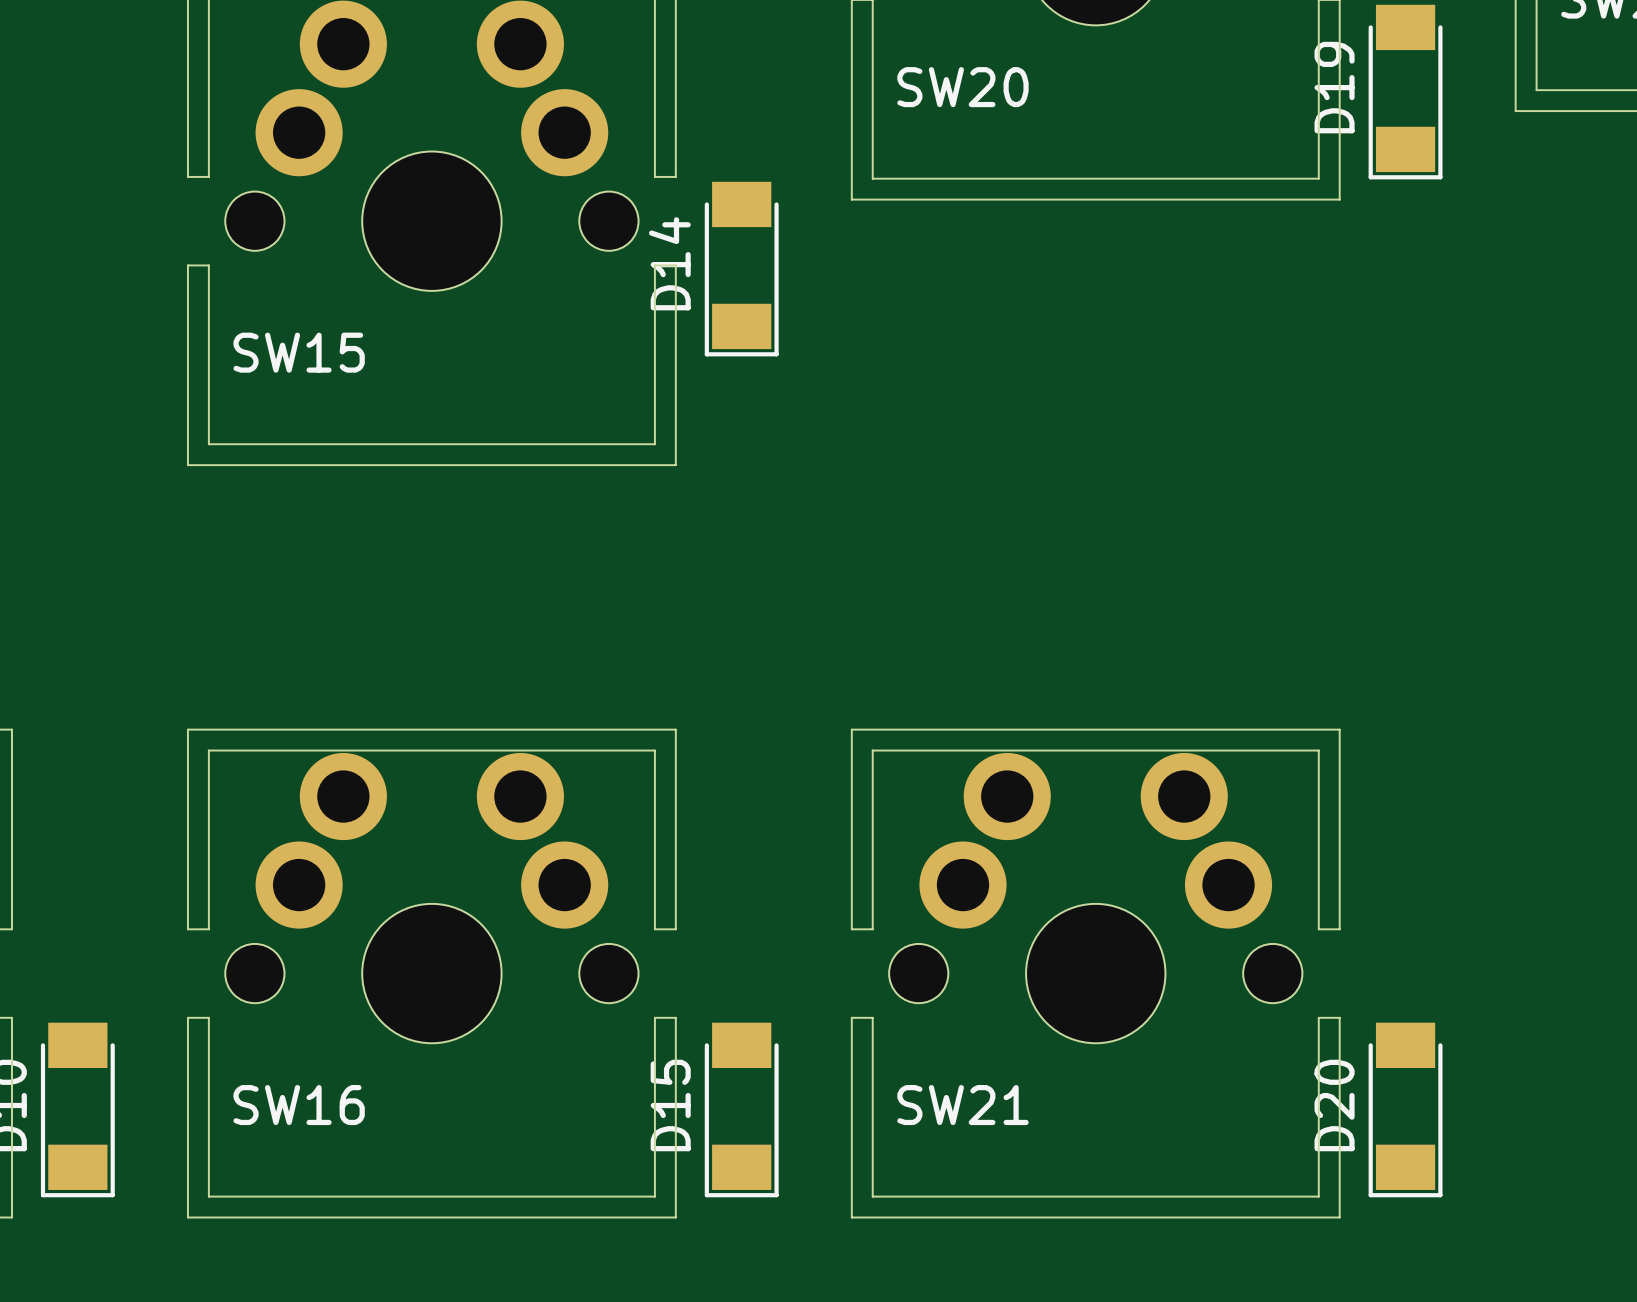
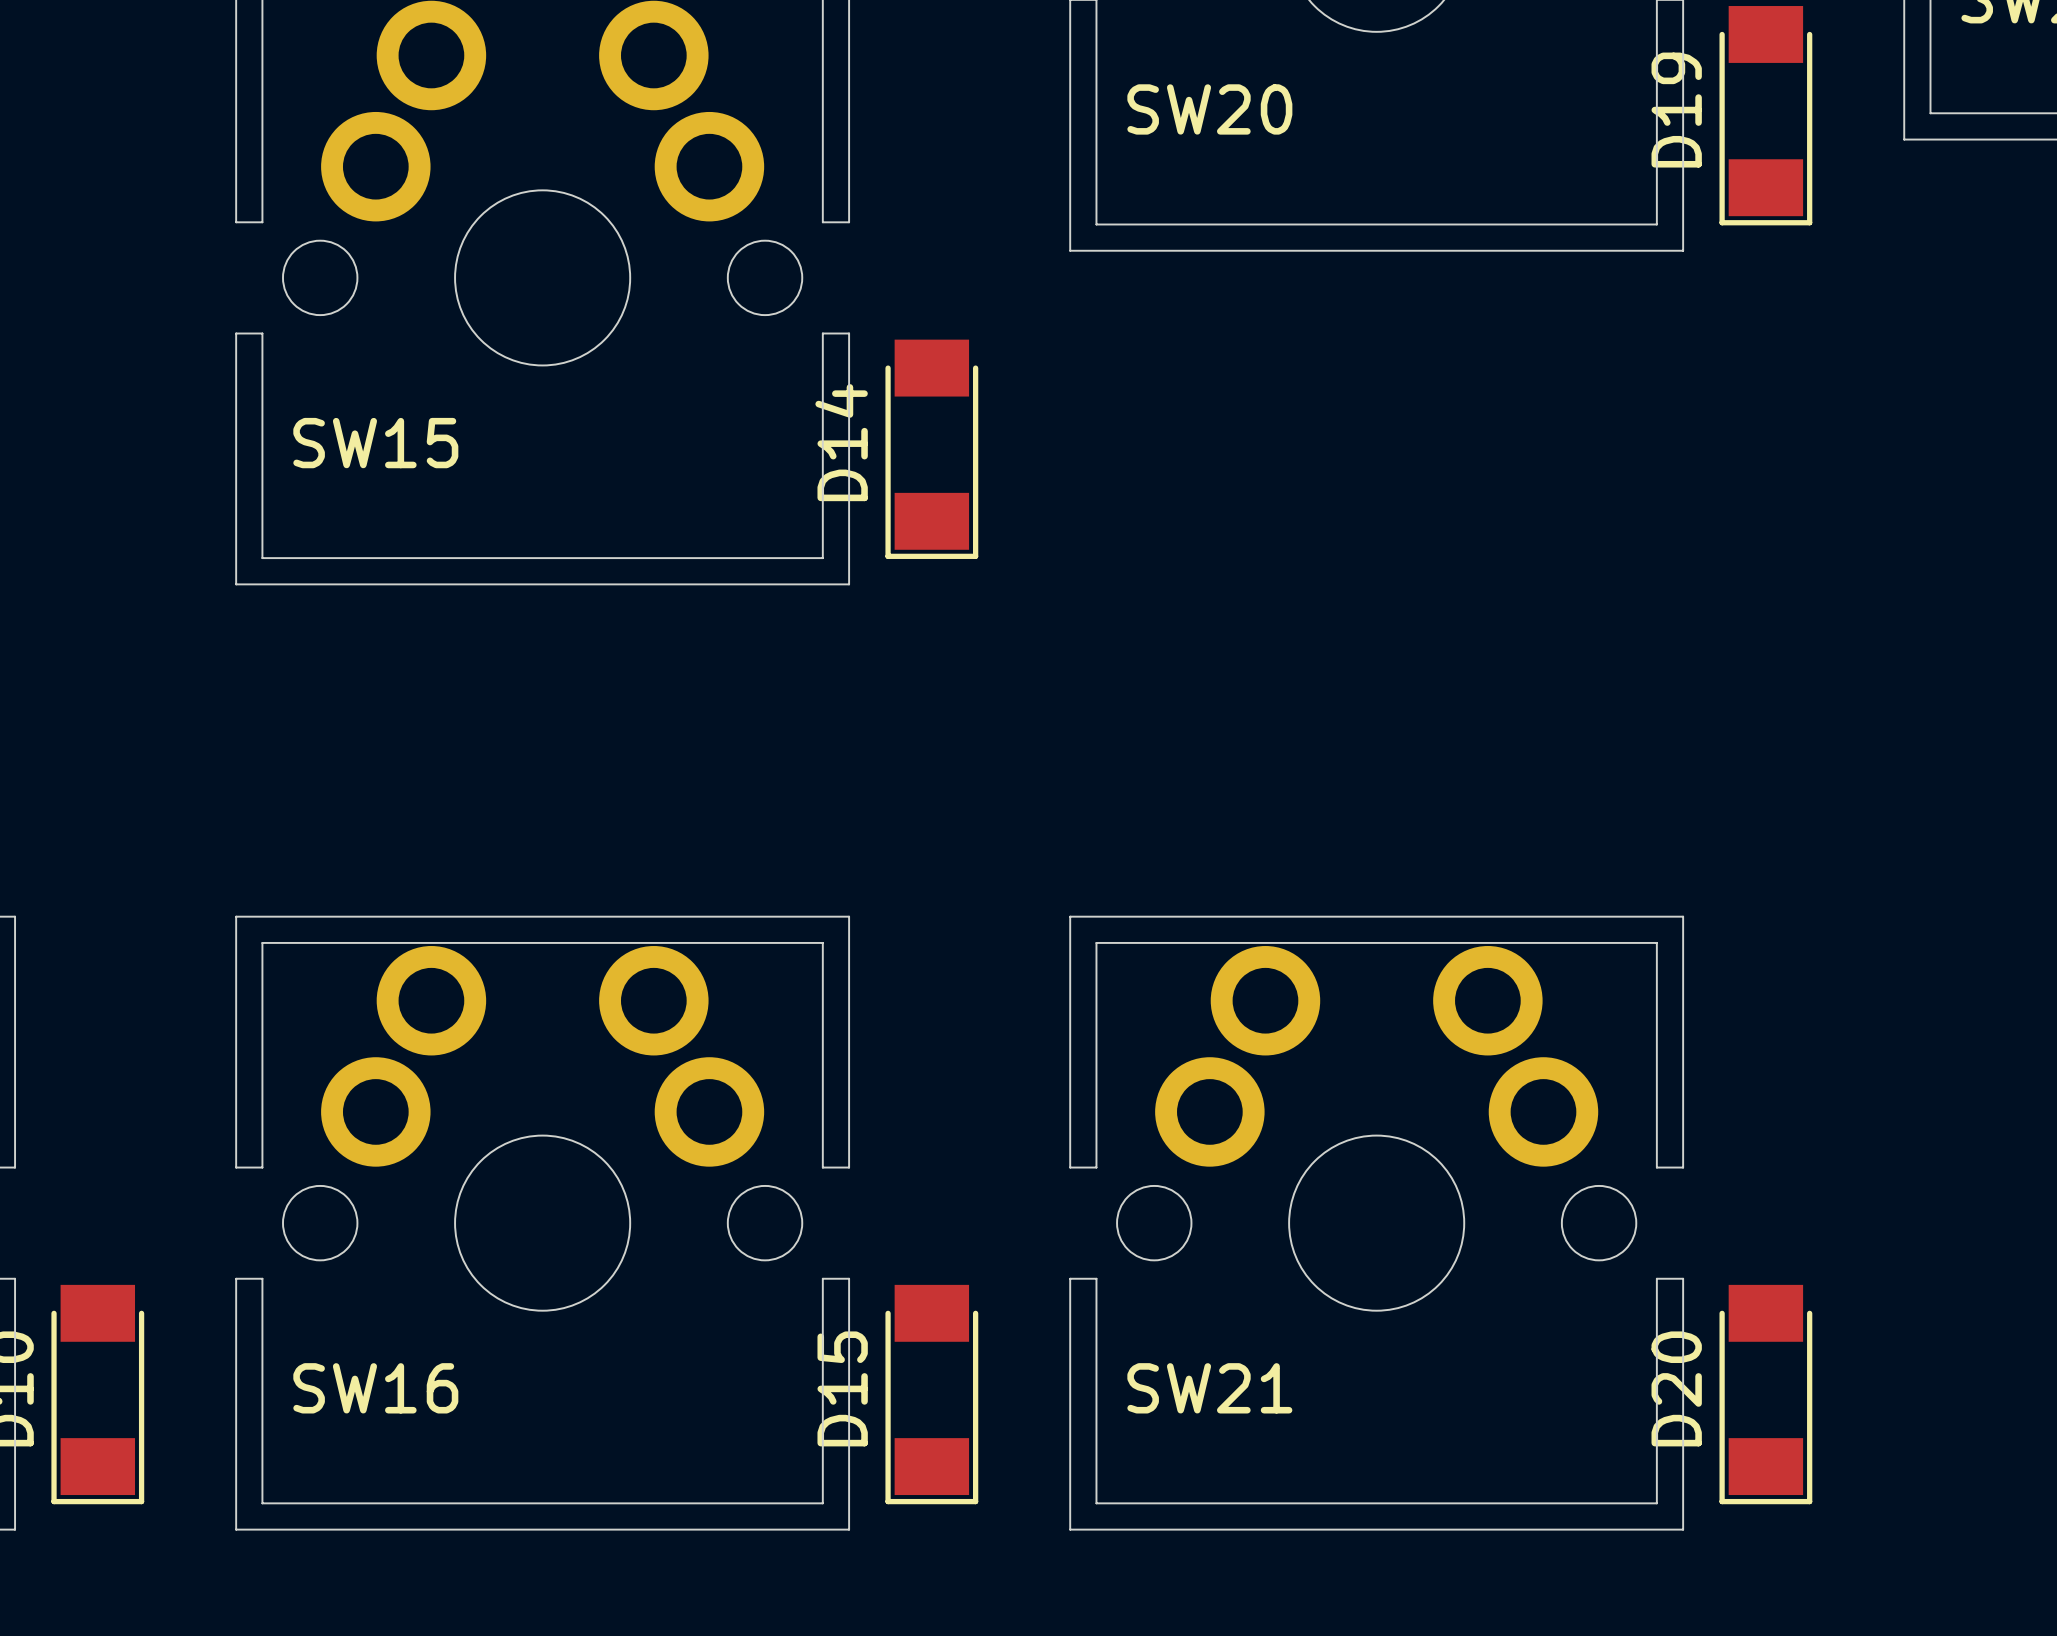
D14 position: (741, 269) -> (931, 449)

